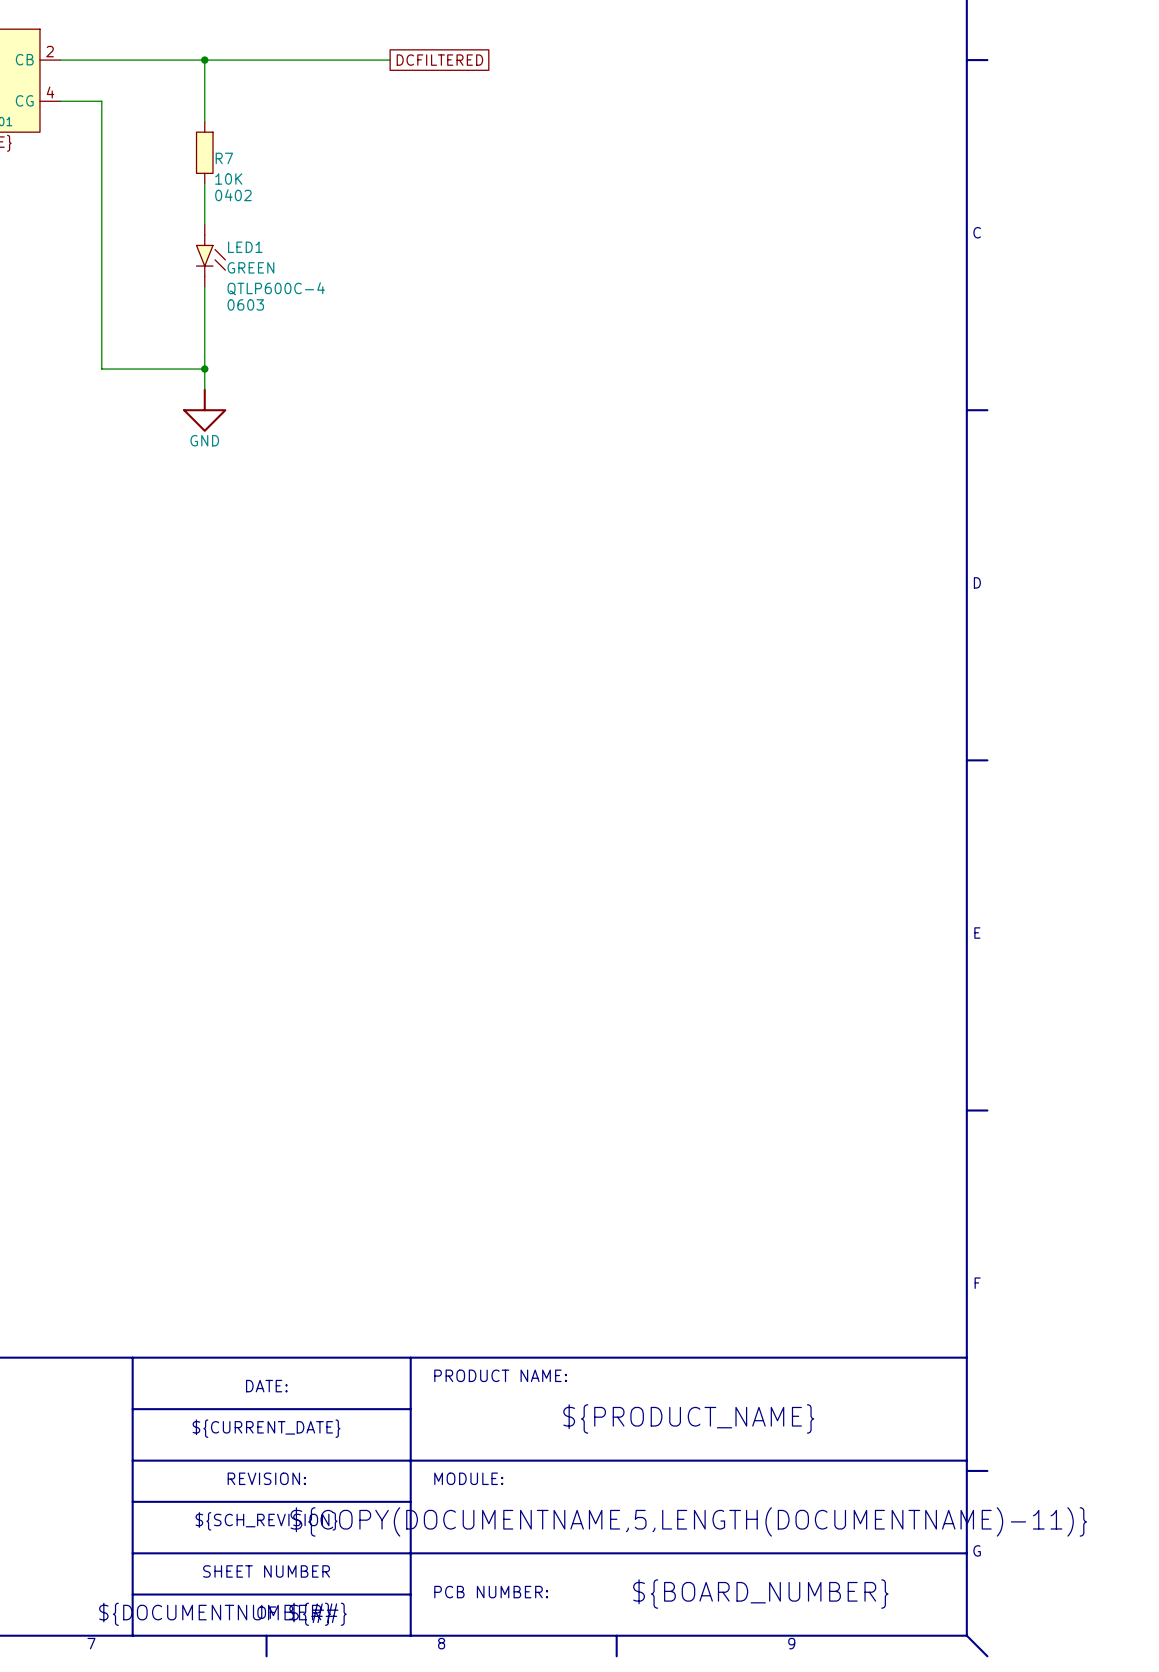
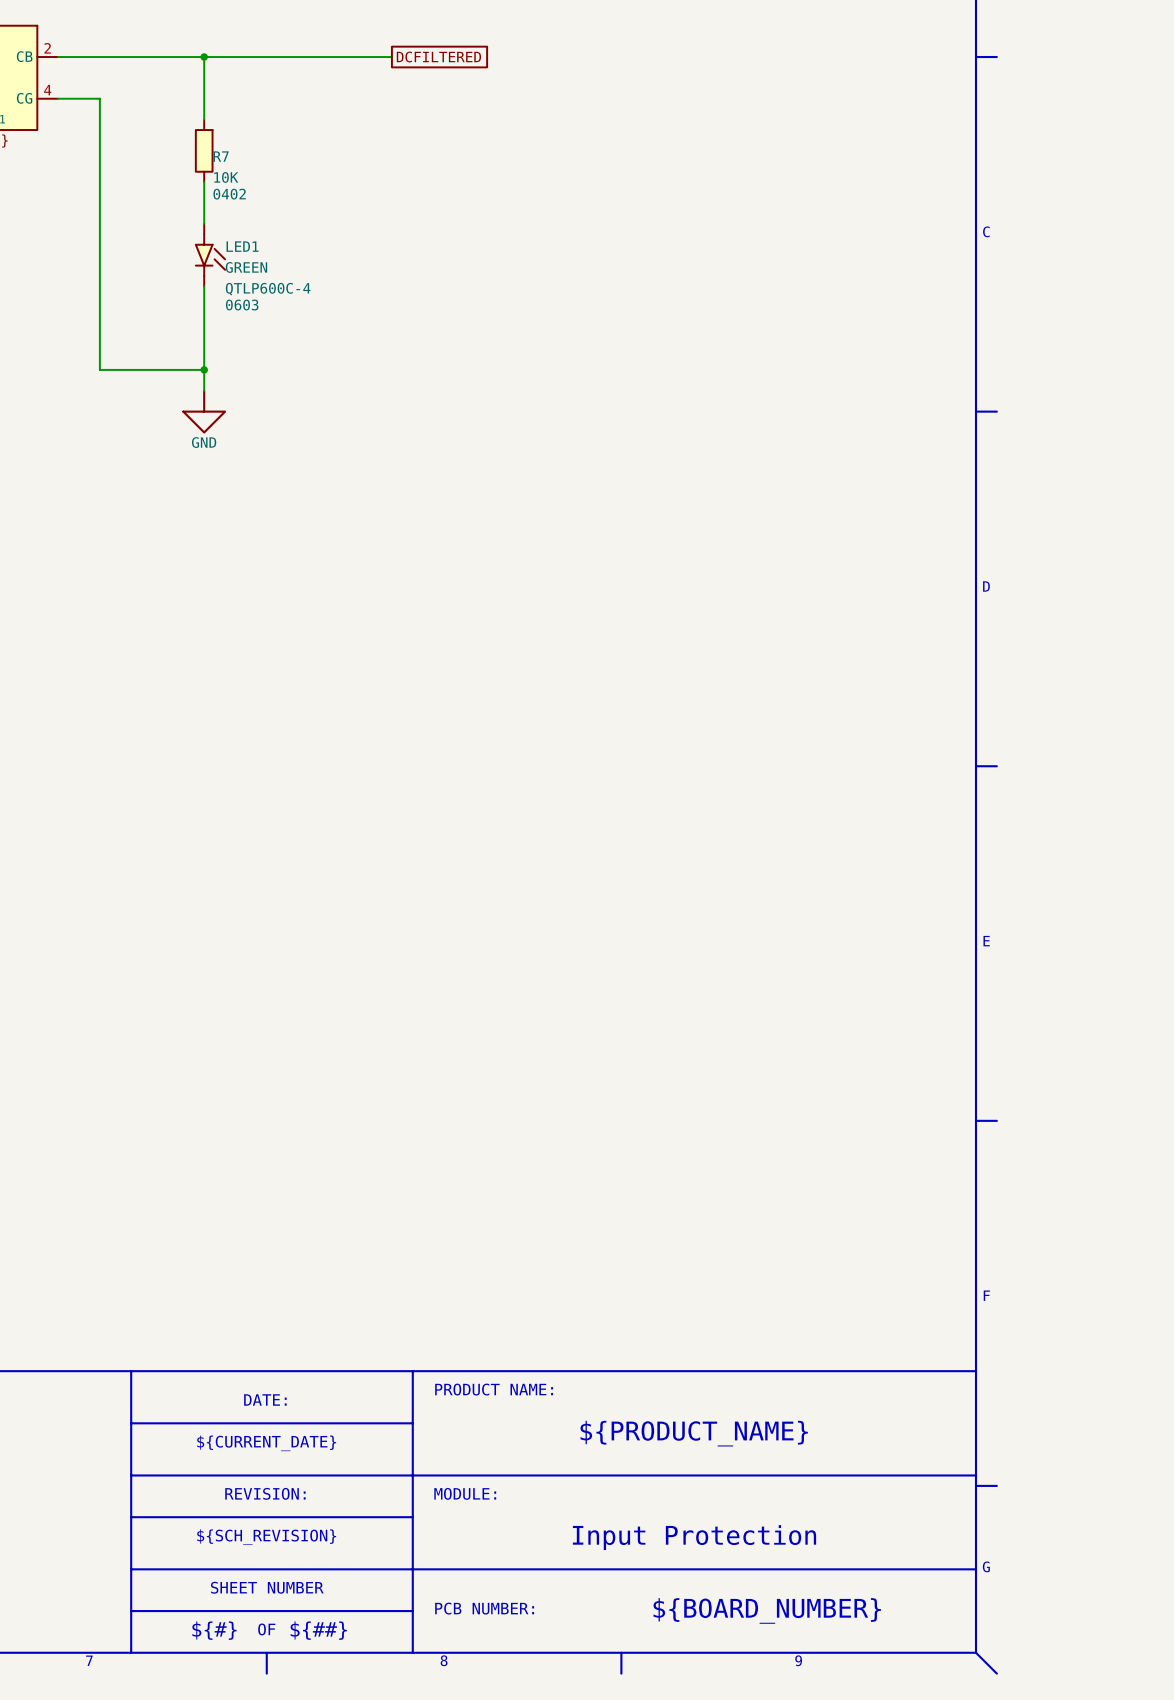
text: ${COPY(DOCUMENTNAME,5,LENGTH(DOCUMENTNAME)-11)} (688, 1521) -> Input Protection (694, 1537)
text: ${DOCUMENTNUMBER} (215, 1614) -> ${#} (214, 1630)

